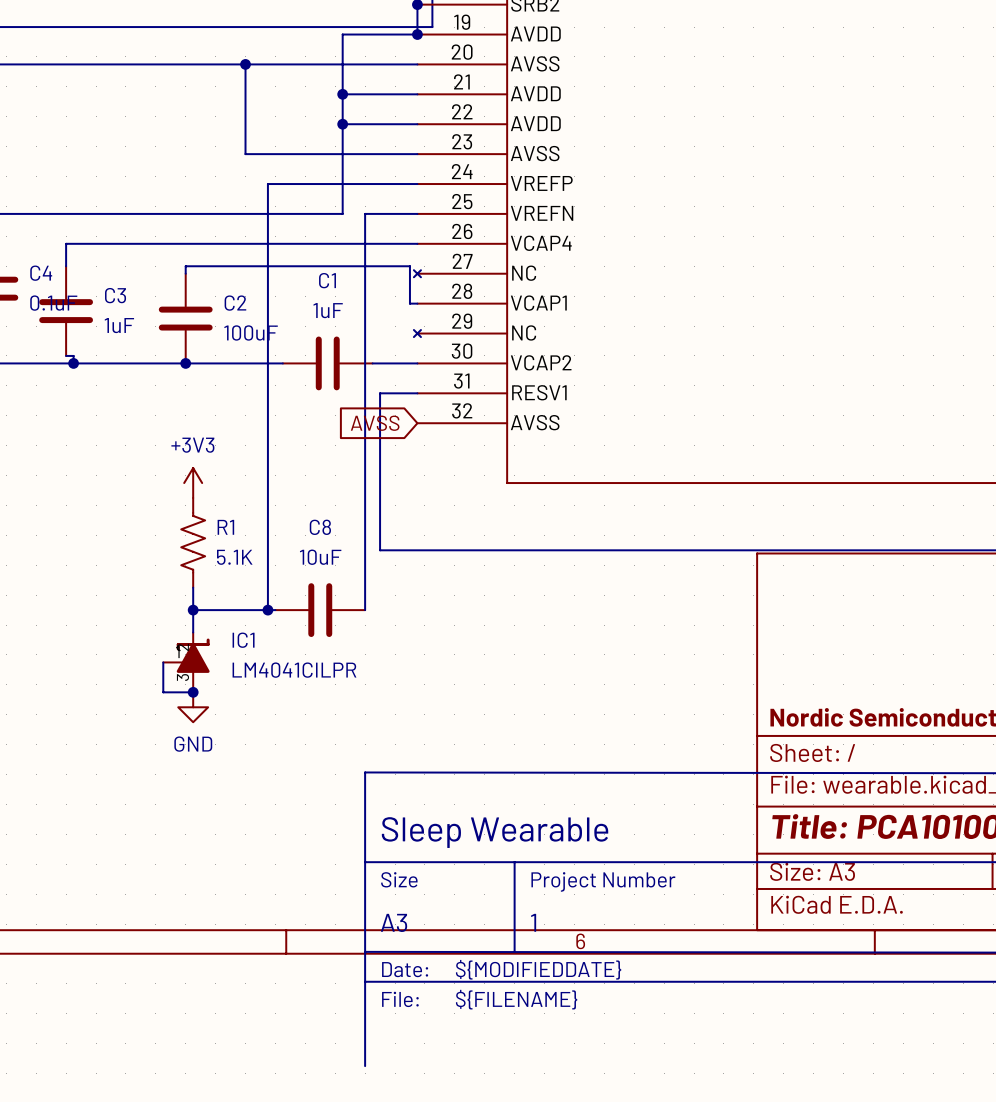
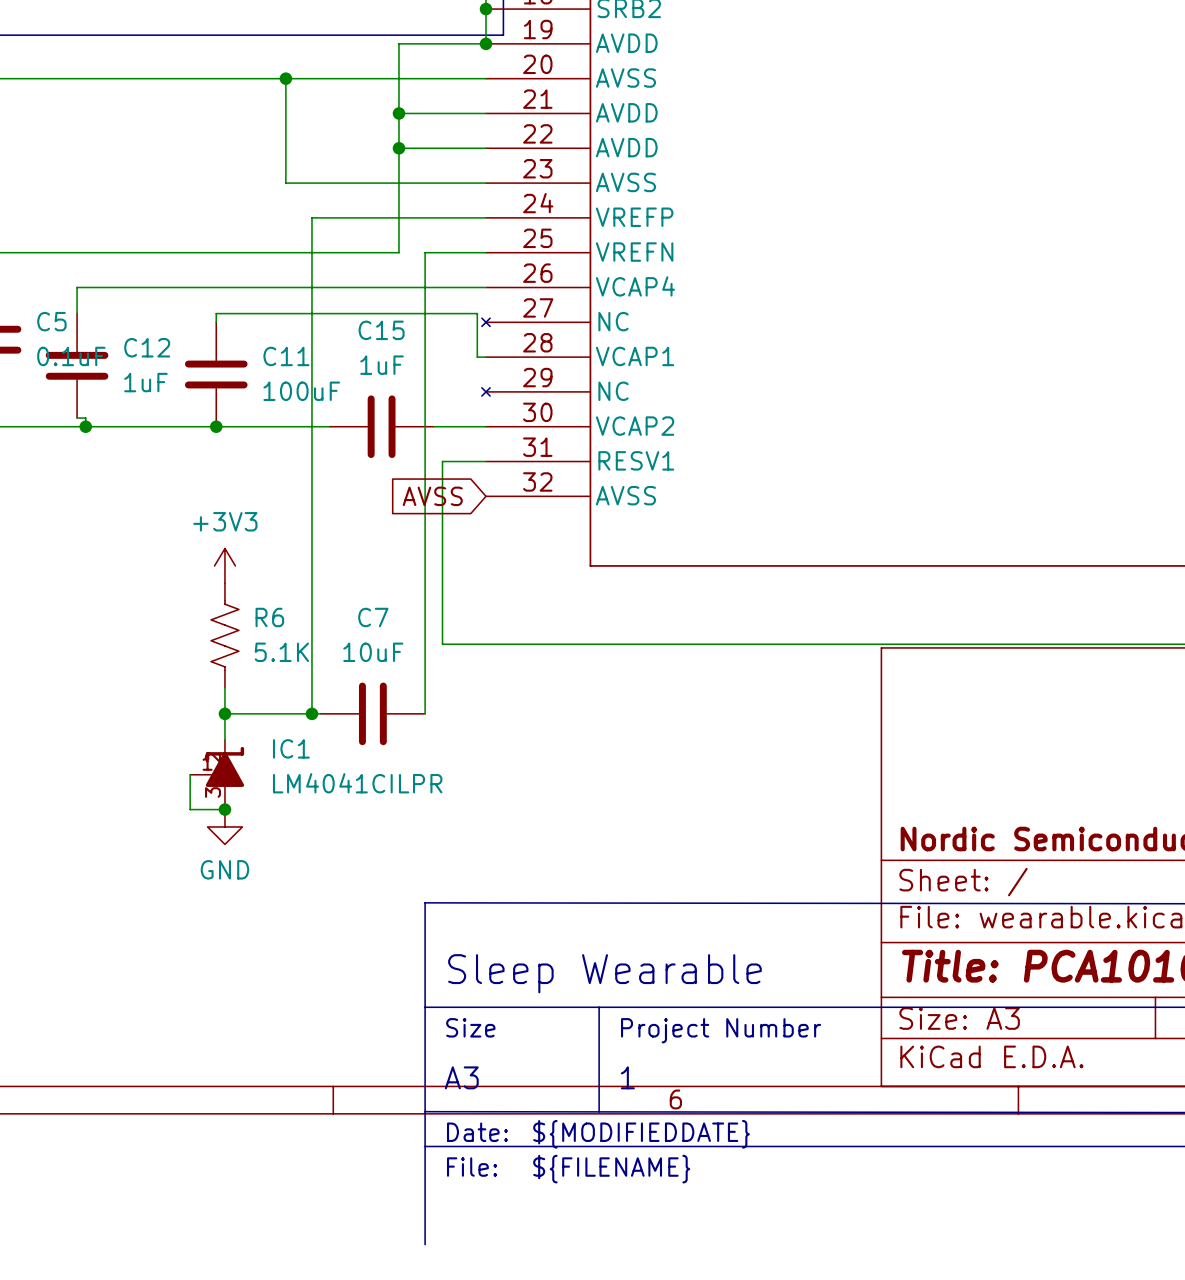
C4 name: C4 (41, 273) -> C5 (51, 321)
C1 name: C1 (327, 280) -> C15 (381, 330)
C3 name: C3 (115, 295) -> C12 (147, 347)
C2 name: C2 (235, 303) -> C11 (286, 356)
R1 name: R1 (225, 527) -> R6 (269, 617)
C8 name: C8 (320, 527) -> C7 (373, 617)

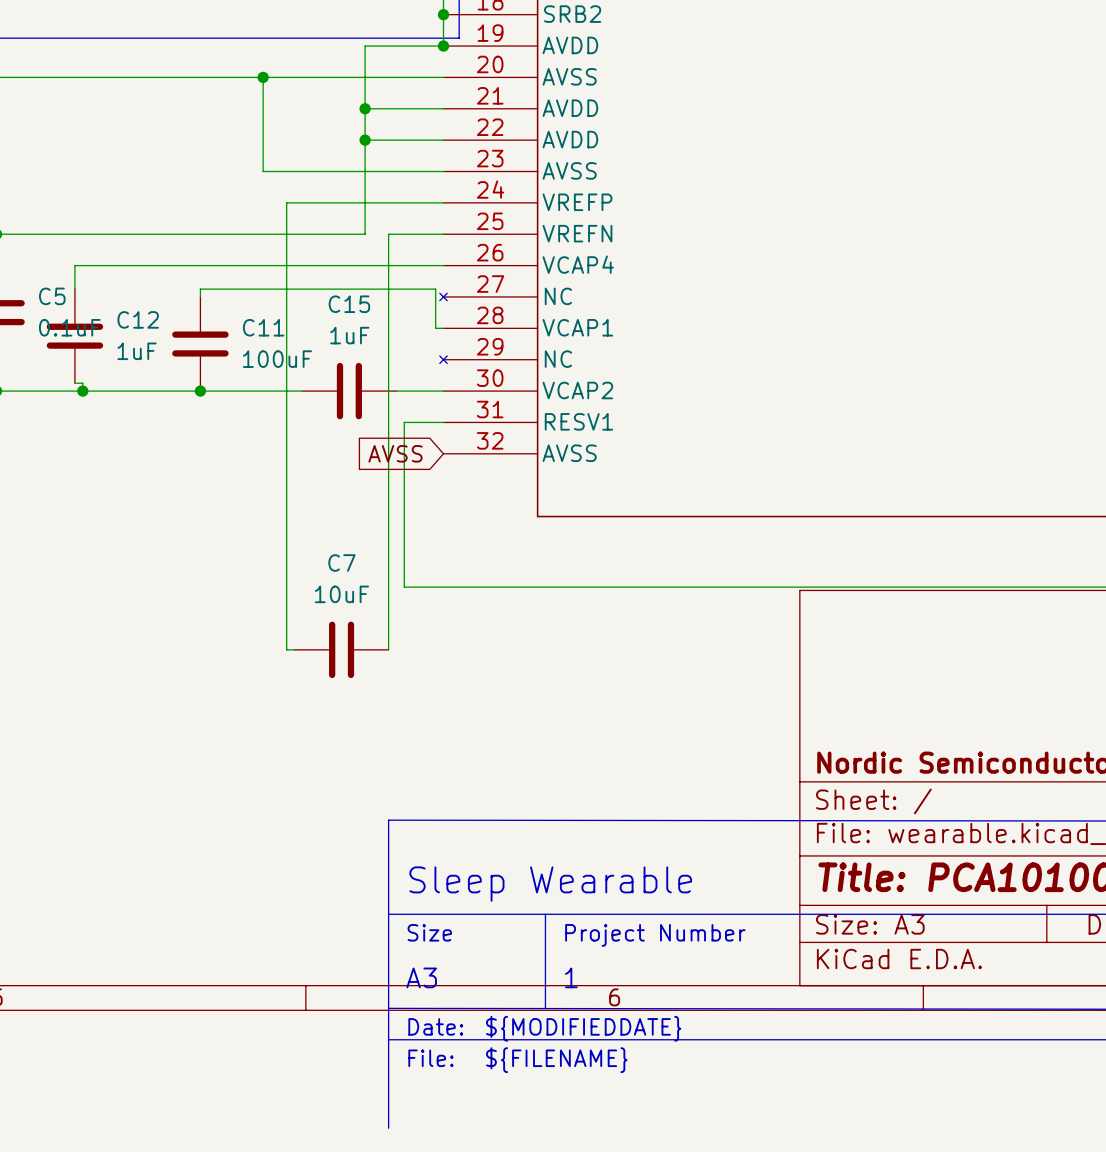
power symbol: +3V3 (224, 565) -> none
R6: 5.1K (224, 635) -> none
wire: (224, 687) (224, 739) -> none
wire: (224, 713) (311, 713) -> none
junction: (224, 713) -> none
junction: (311, 713) -> none
wire: (190, 774) (190, 809) (224, 809) -> none
IC1: LM4041CILPR (217, 774) -> none
junction: (224, 809) -> none
power symbol: GND (224, 826) -> none

